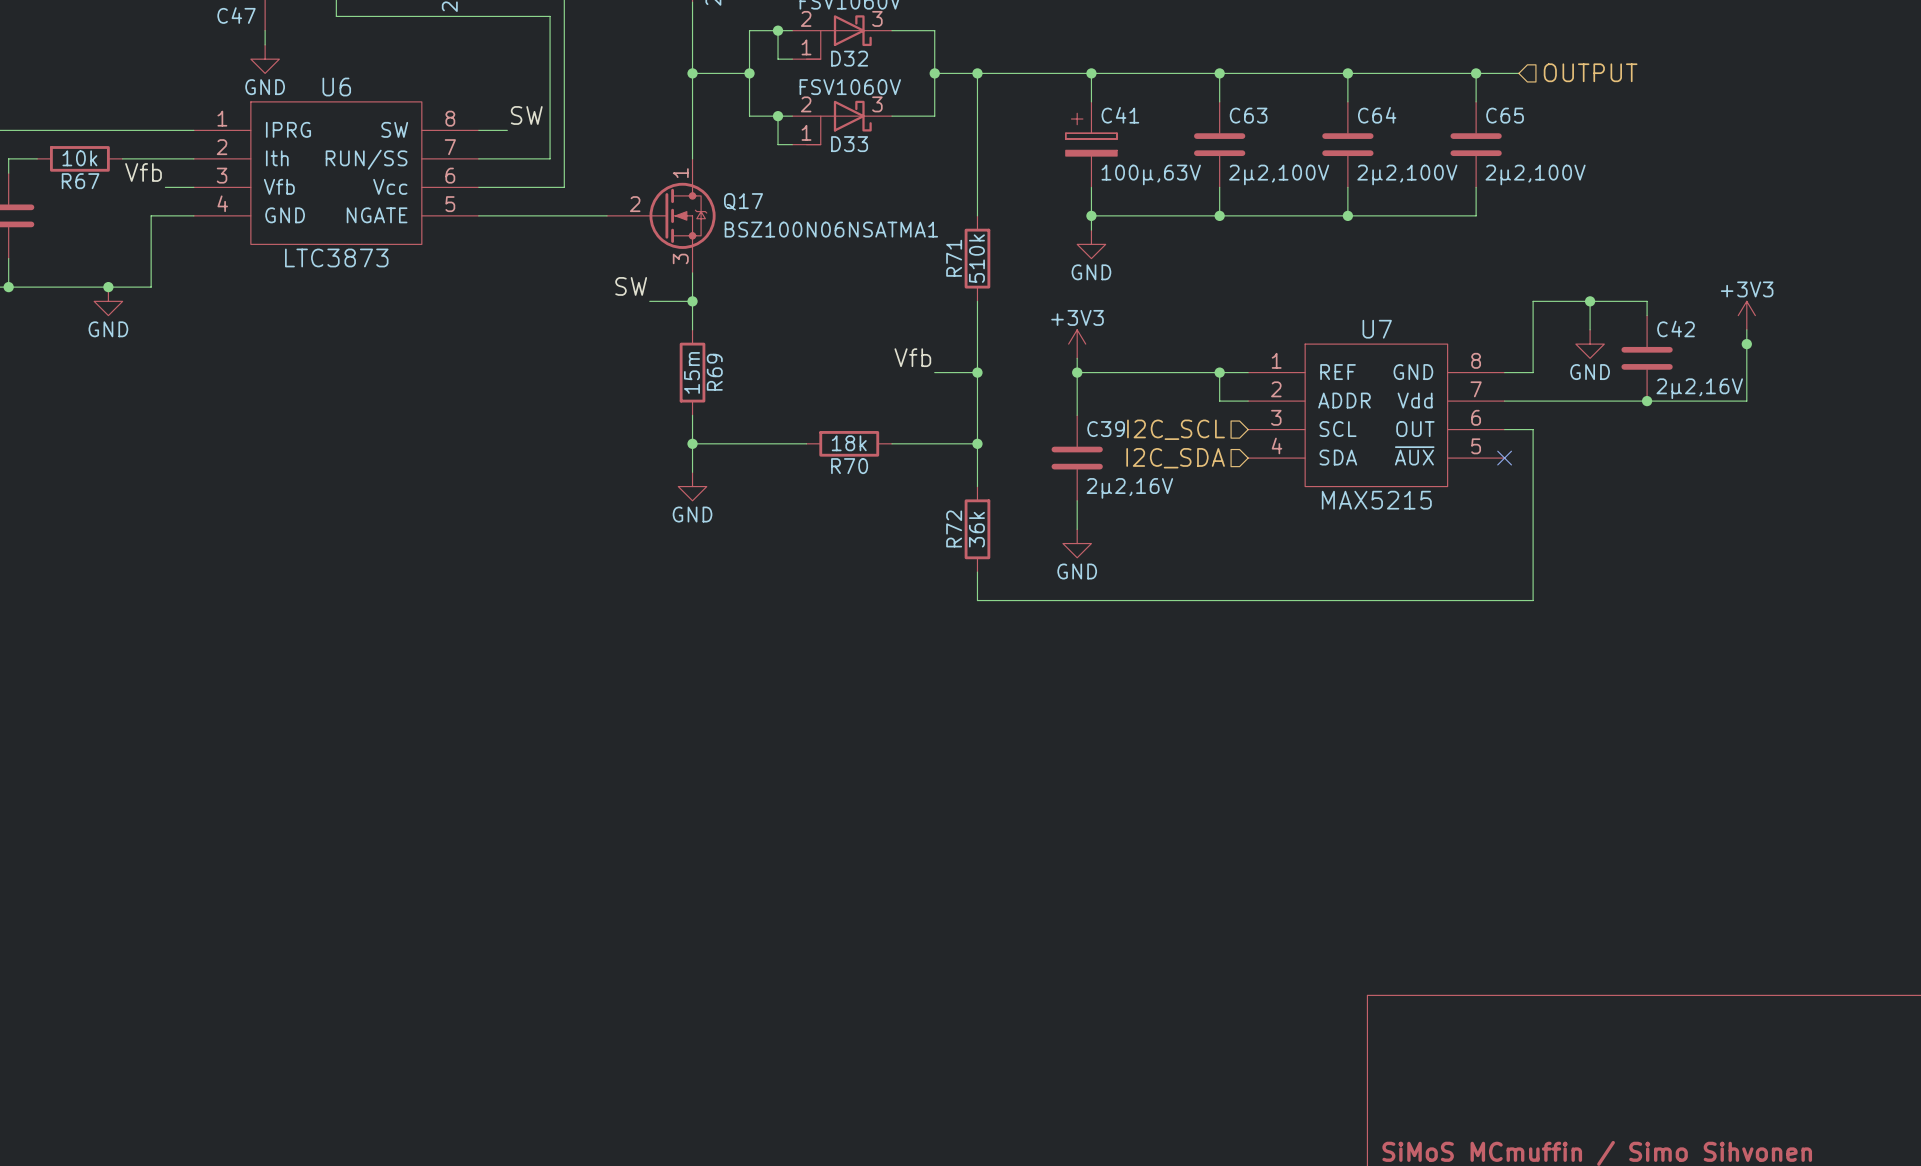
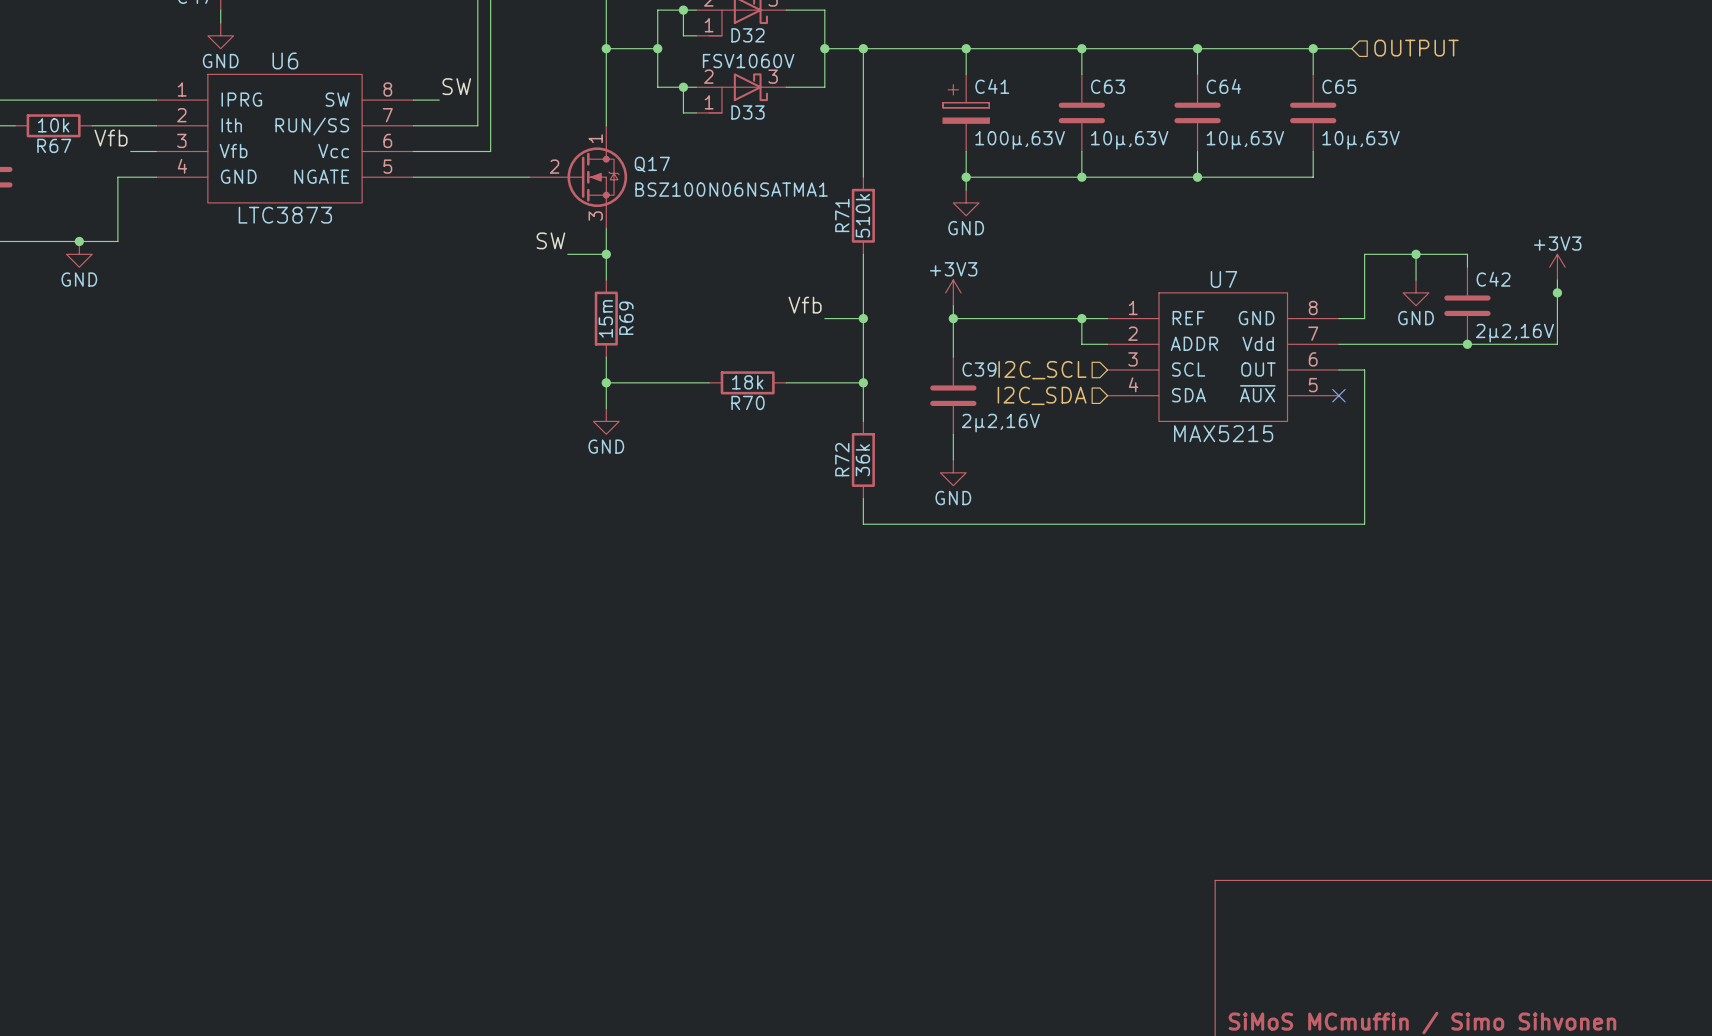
C63 value: 2µ2,100V (1279, 174) -> 10µ,63V (1129, 140)
C64 value: 2µ2,100V (1407, 174) -> 10µ,63V (1245, 140)
C65 value: 2µ2,100V (1535, 174) -> 10µ,63V (1361, 140)

